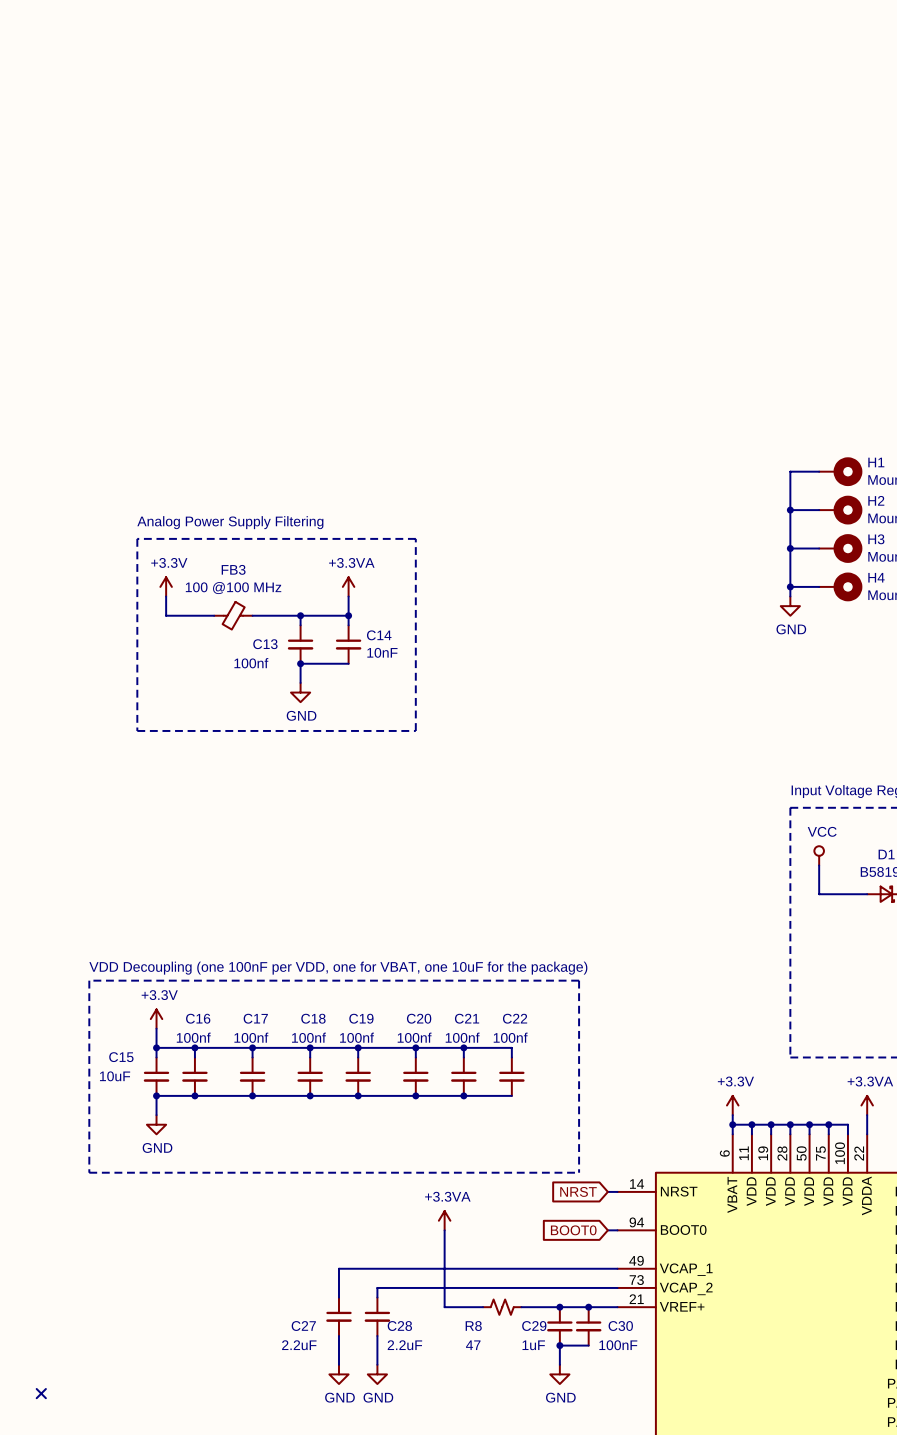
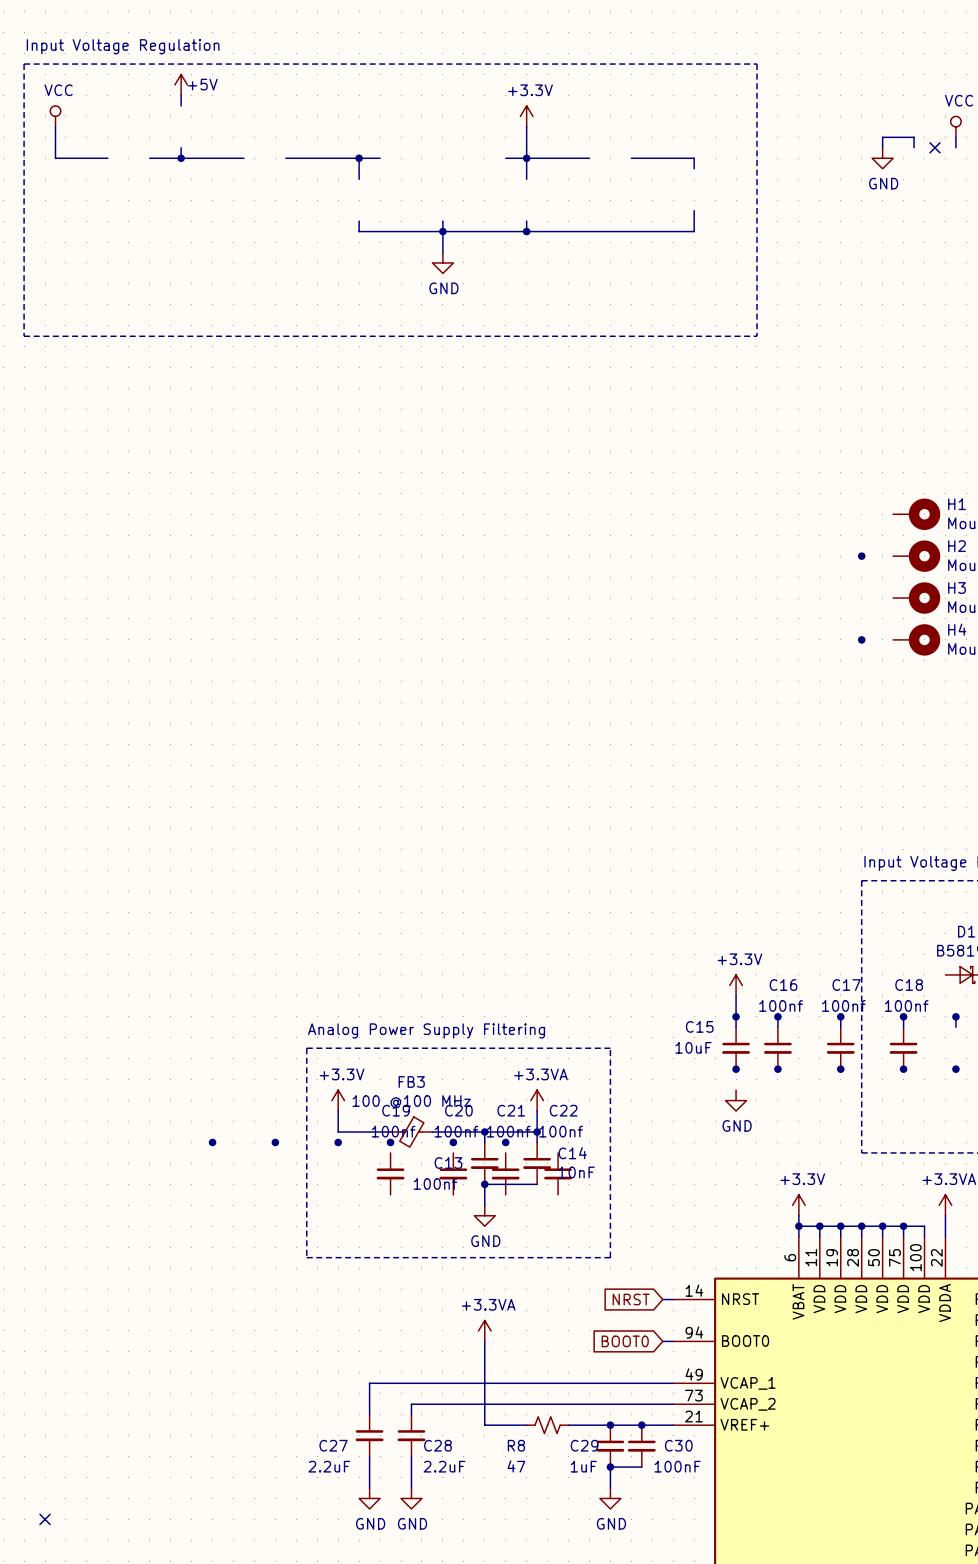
text: none -> Input Voltage Regulation (123, 46)
line: none -> (24, 64) (24, 336) (756, 336) (756, 64) (24, 64)
power symbol: none -> +5V (181, 84)
wire: none -> (181, 95) (181, 105)
power symbol: none -> VCC (55, 116)
power symbol: none -> +3.3V (526, 116)
wire: none -> (55, 126) (55, 158) (107, 158)
wire: none -> (526, 126) (526, 179)
power symbol: none -> VCC (955, 126)
wire: none -> (955, 137) (955, 147)
wire: none -> (181, 147) (181, 158)
wire: none -> (882, 147) (882, 137) (914, 137) (914, 147)
no-connect mark: none -> (934, 147)
wire: none -> (149, 158) (243, 158)
junction: none -> (181, 158)
wire: none -> (285, 158) (380, 158)
wire: none -> (359, 158) (359, 179)
junction: none -> (359, 158)
wire: none -> (505, 158) (589, 158)
junction: none -> (526, 158)
wire: none -> (631, 158) (694, 158) (694, 168)
power symbol: none -> GND (882, 158)
wire: none -> (694, 210) (694, 231) (359, 231) (359, 221)
wire: none -> (442, 221) (442, 252)
wire: none -> (526, 221) (526, 231)
junction: none -> (442, 231)
junction: none -> (526, 231)
power symbol: none -> GND (442, 262)
wire: (819, 471) (790, 471) (790, 596) -> none
wire: (790, 510) (819, 510) -> none
text: Analog Power Supply Filtering (230, 522) -> none
line: (137, 538) (137, 730) (415, 730) (415, 538) (137, 538) -> none
wire: (790, 548) (819, 548) -> none
junction: (790, 548) -> none
power symbol: +3.3V (166, 586) -> none
power symbol: +3.3VA (348, 586) -> none
wire: (790, 586) (819, 586) -> none
wire: (166, 596) (166, 615) (214, 615) -> none
wire: (348, 596) (348, 625) -> none
power symbol: GND (790, 606) -> none
FB3 position: (233, 615) -> (411, 1132)
wire: (252, 615) (348, 615) -> none
wire: (300, 615) (300, 625) -> none
junction: (300, 615) -> none
junction: (348, 615) -> none
C13 position: (300, 644) -> (484, 1163)
C14 position: (348, 644) -> (537, 1163)
junction: (300, 663) -> none
wire: (348, 663) (300, 663) (300, 682) -> none
power symbol: GND (300, 692) -> none
power symbol: VCC (819, 855) -> none
wire: (819, 865) (819, 894) (867, 894) -> none
power symbol: none -> +3.3V (736, 985)
wire: none -> (736, 995) (736, 1027)
junction: none -> (736, 1016)
wire: none -> (777, 1016) (777, 1027)
junction: none -> (777, 1016)
wire: none -> (840, 1016) (840, 1027)
junction: none -> (840, 1016)
wire: none -> (903, 1016) (903, 1027)
junction: none -> (903, 1016)
wire: none -> (955, 1016) (955, 1027)
junction: none -> (955, 1016)
text: none -> Analog Power Supply Filtering (426, 1030)
line: none -> (306, 1048) (306, 1257) (610, 1257) (610, 1048) (306, 1048)
text: VDD Decoupling (one 100nF per VDD, one for VBAT, one 10uF for the package) (338, 968) -> none
line: (89, 980) (579, 980) (579, 1172) (89, 1172) (89, 980) -> none
junction: none -> (736, 1069)
junction: none -> (777, 1069)
junction: none -> (840, 1069)
junction: none -> (903, 1069)
junction: none -> (955, 1069)
power symbol: none -> +3.3VA (537, 1100)
power symbol: none -> GND (736, 1100)
power symbol position: +3.3V (156, 1019) -> +3.3V (338, 1100)
wire: none -> (338, 1111) (338, 1132) (390, 1132)
wire: none -> (537, 1111) (537, 1142)
wire: (156, 1028) (156, 1057) -> none
wire: none -> (432, 1132) (537, 1132)
junction: none -> (484, 1132)
junction: none -> (537, 1132)
wire: (156, 1047) (511, 1047) (511, 1057) -> none
junction: (156, 1047) -> none
wire: (194, 1047) (194, 1057) -> none
wire: (252, 1047) (252, 1057) -> none
wire: (310, 1047) (310, 1057) -> none
wire: (358, 1047) (358, 1057) -> none
wire: (415, 1047) (415, 1057) -> none
wire: (463, 1047) (463, 1057) -> (484, 1132) (484, 1142)
C15 position: (156, 1076) -> (736, 1048)
C16 position: (194, 1076) -> (777, 1048)
C17 position: (252, 1076) -> (840, 1048)
C18 position: (310, 1076) -> (903, 1048)
junction: none -> (484, 1184)
wire: none -> (537, 1184) (484, 1184) (484, 1205)
junction: (156, 1095) -> none
junction: (194, 1095) -> none
junction: (252, 1095) -> none
junction: (310, 1095) -> none
junction: (358, 1095) -> none
junction: (415, 1095) -> none
junction: (463, 1095) -> none
wire: (511, 1095) (156, 1095) (156, 1115) -> none
power symbol: none -> GND (484, 1215)
power symbol: GND (156, 1124) -> none

